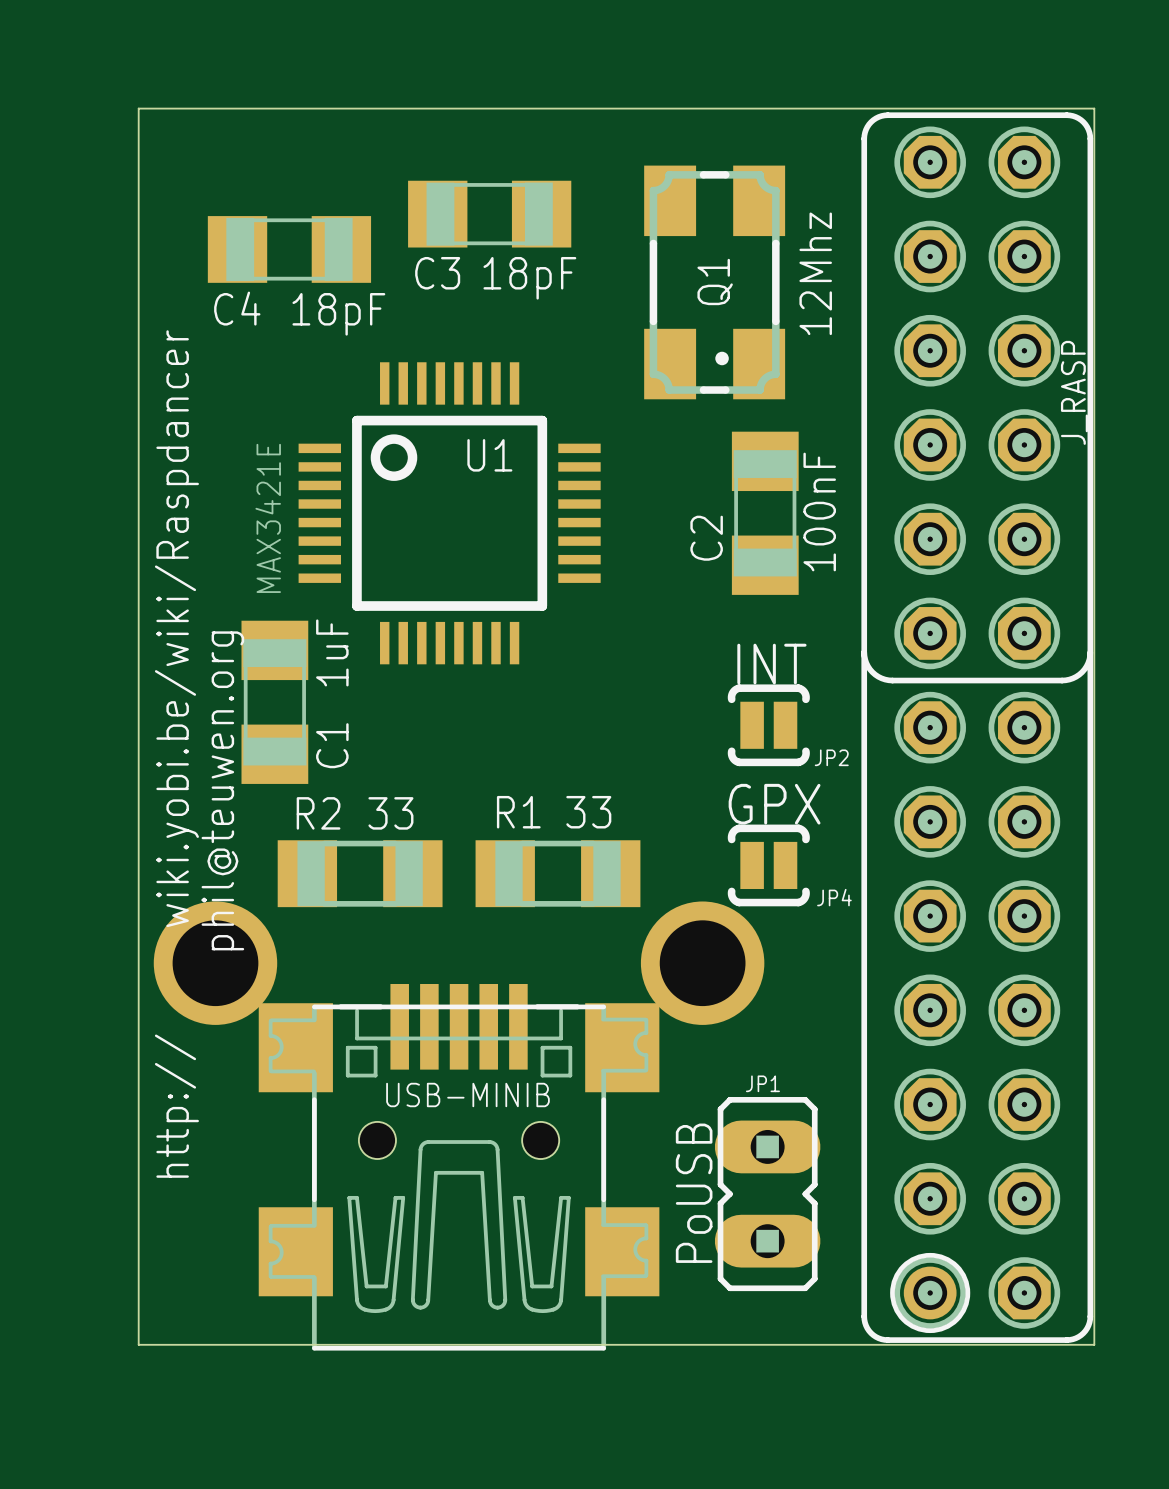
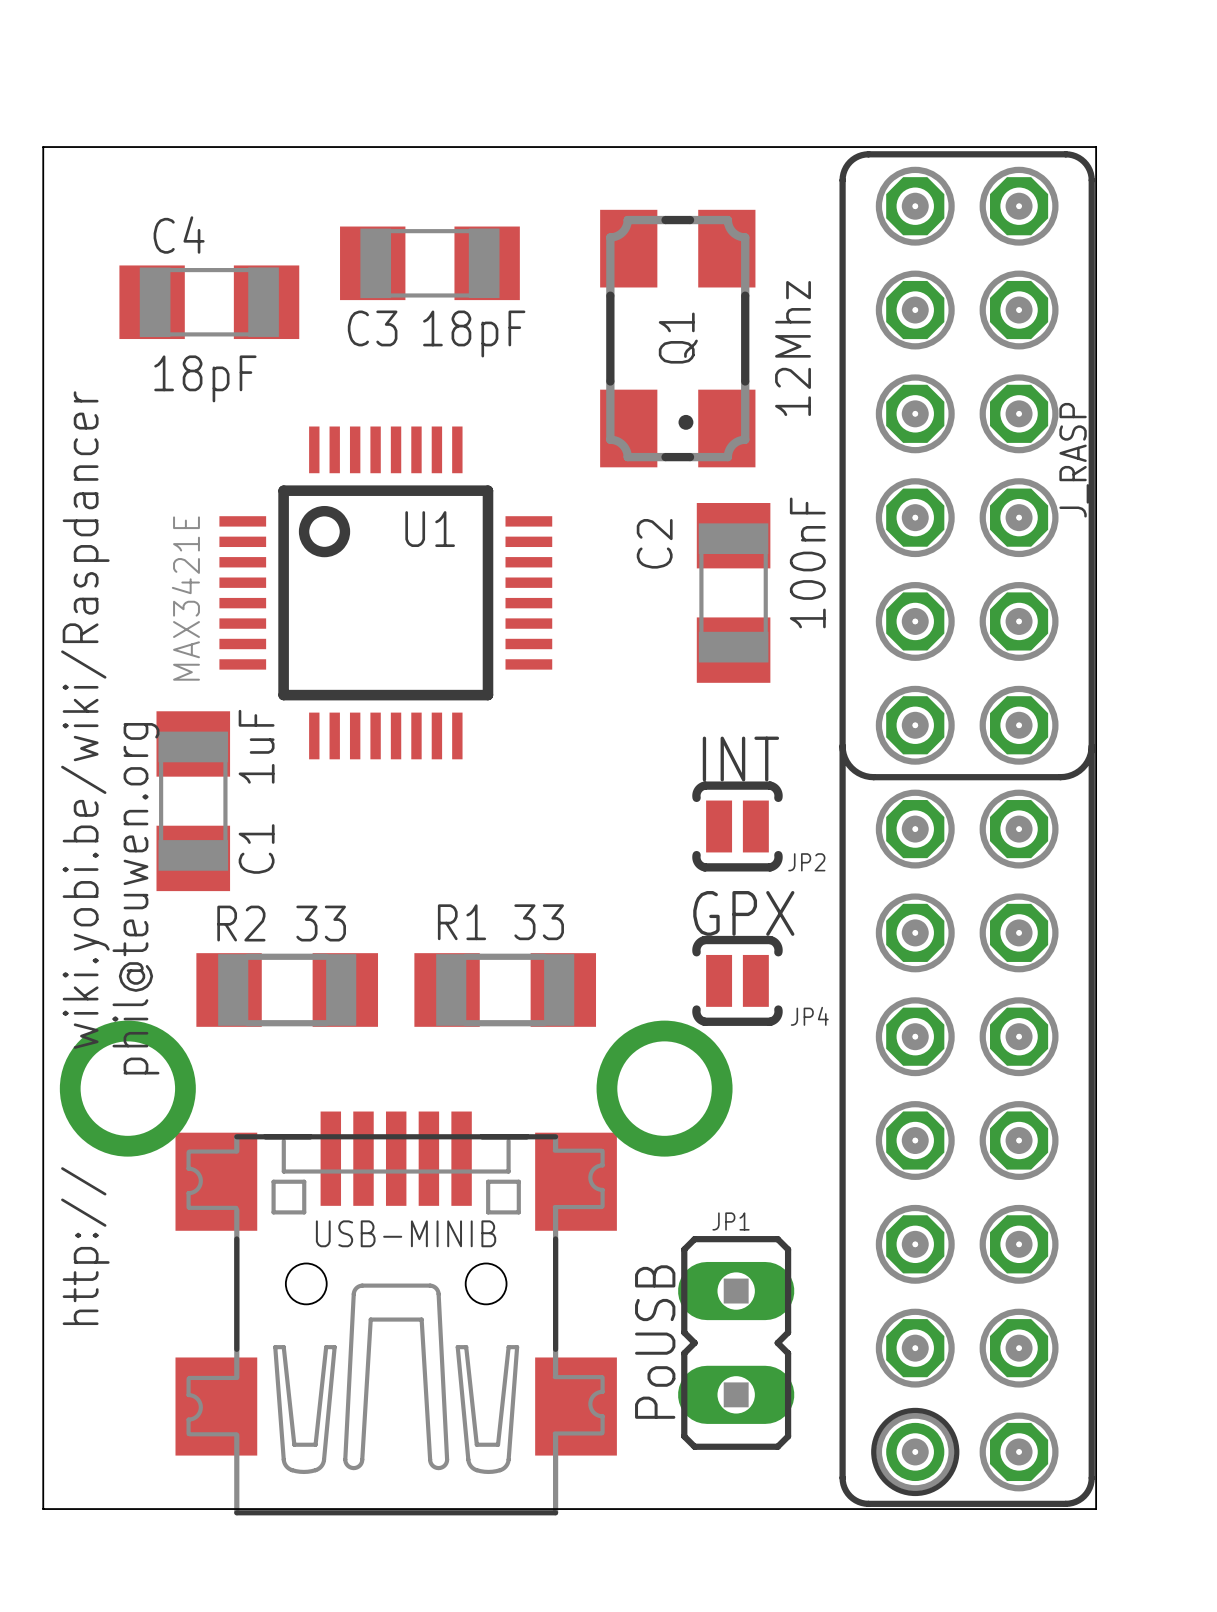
Q1 value position: 12Mhz (815, 273) -> 12Mhz (793, 348)
C4 name position: C4 (237, 308) -> C4 (179, 235)
C4 value position: 18pF (338, 314) -> 18pF (205, 378)
C2 value position: 100nF (819, 511) -> 100nF (807, 562)
C2 name position: C2 (706, 538) -> C2 (654, 543)

